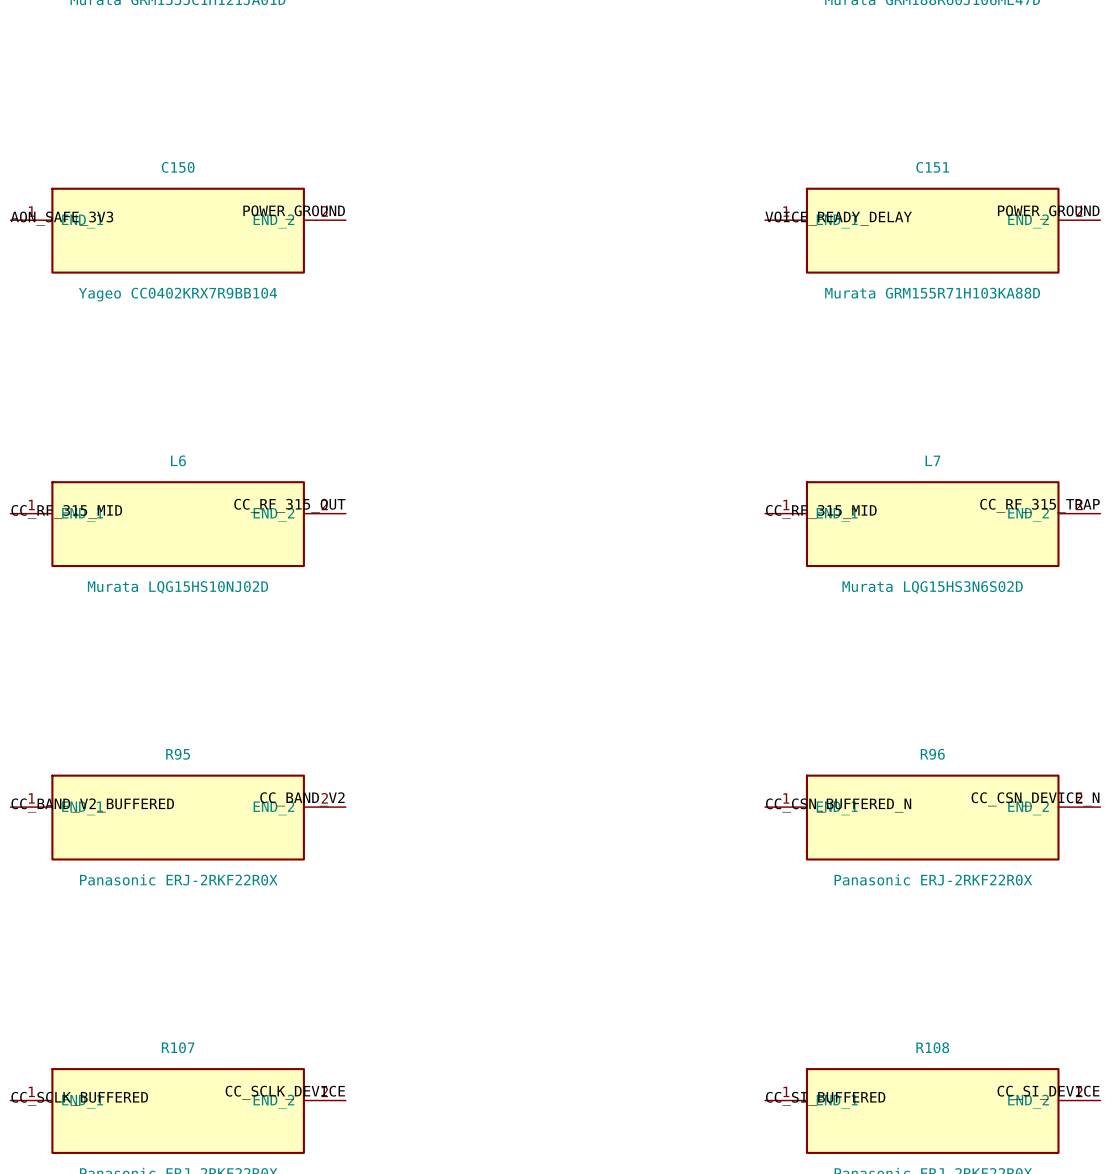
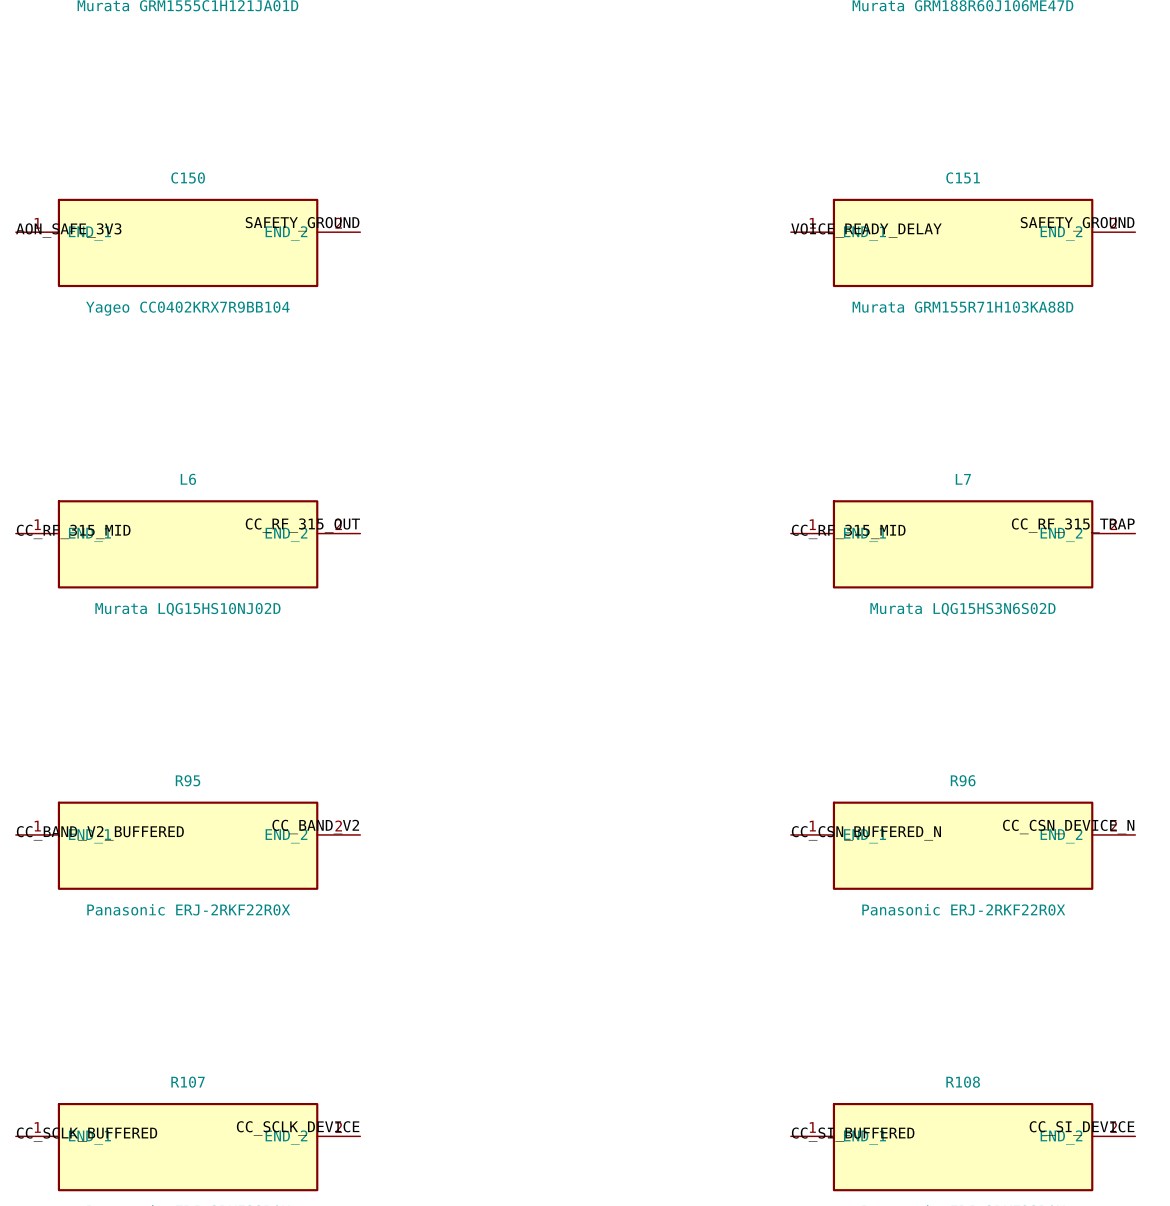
label: POWER_GROUND (294, 212) -> SAFETY_GROUND (302, 224)
label: POWER_GROUND (1048, 212) -> SAFETY_GROUND (1077, 224)

